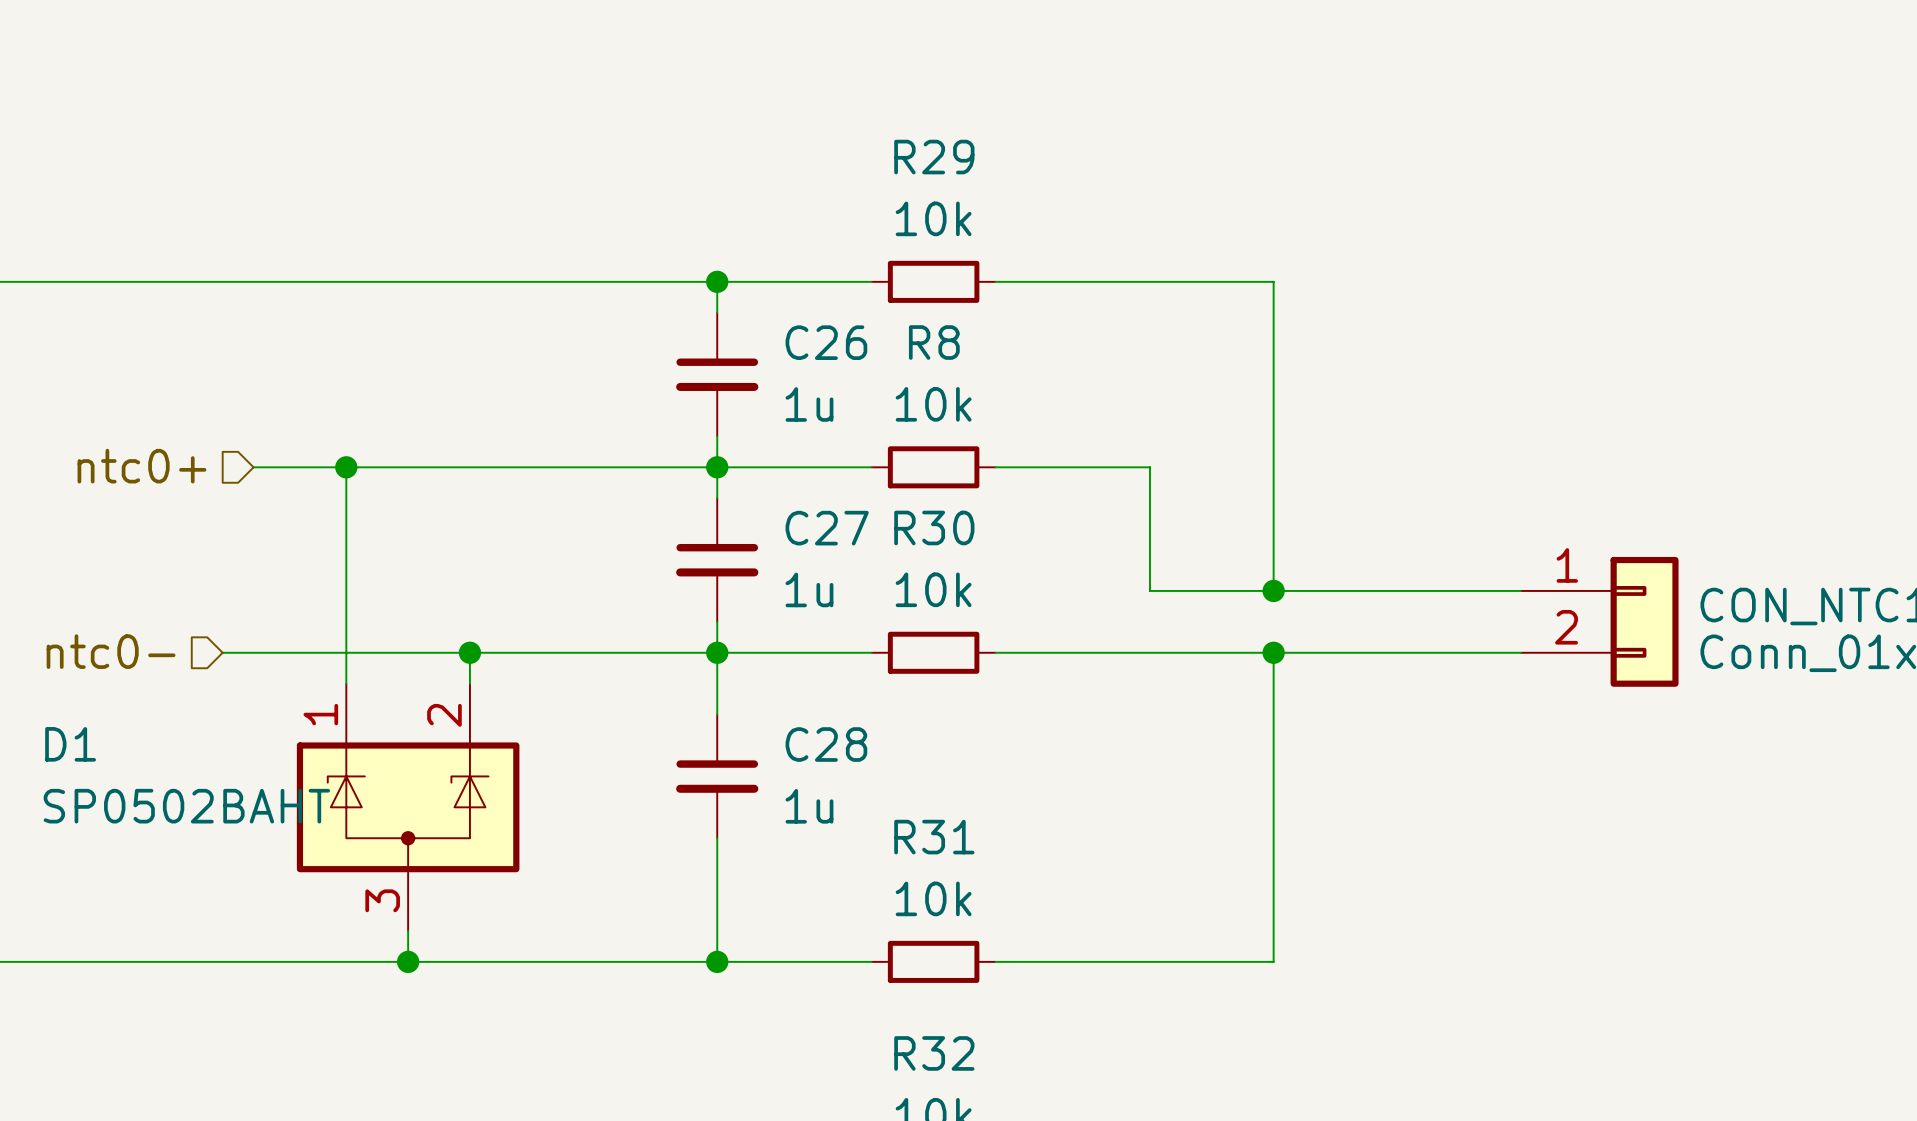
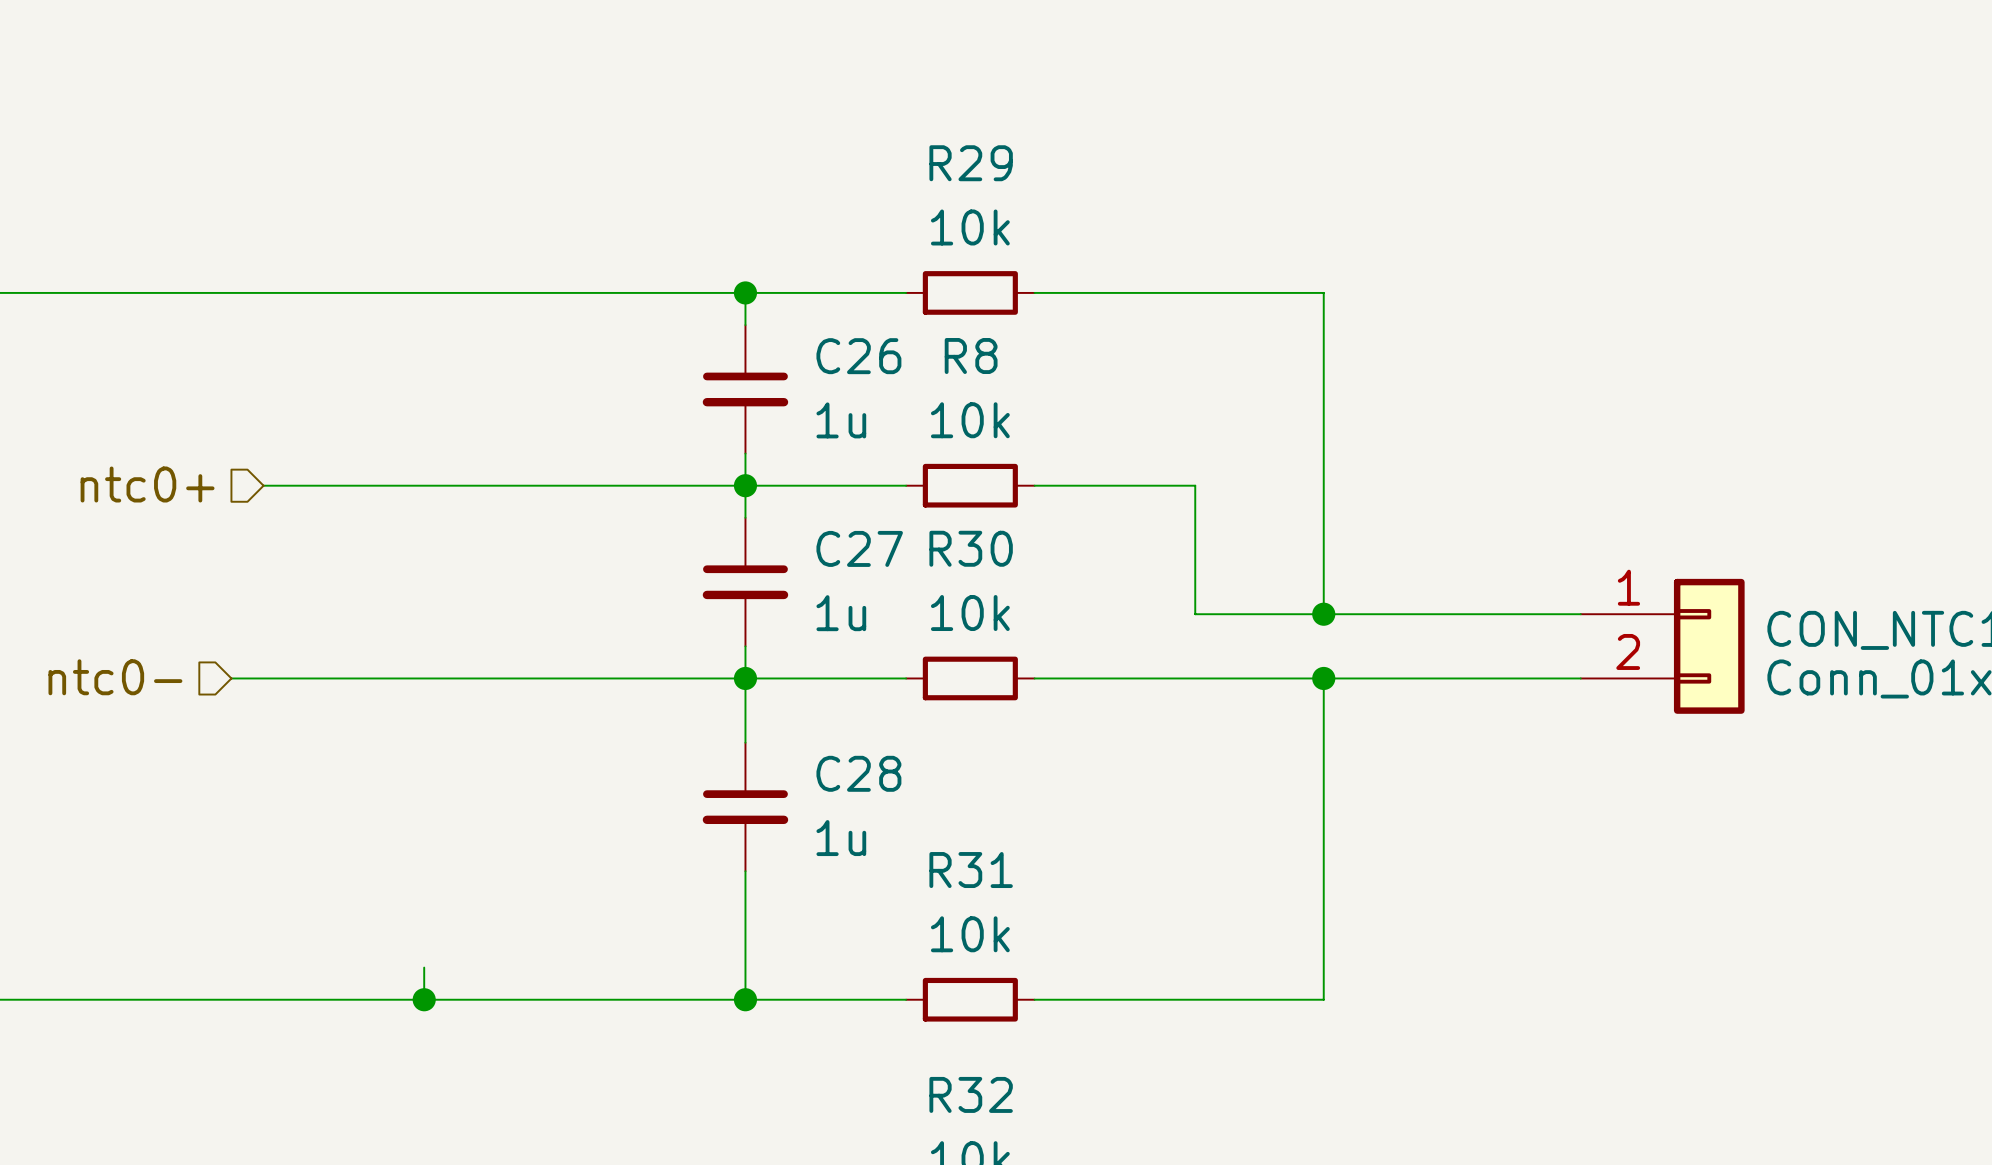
wire: (346, 467) (346, 683) -> none
junction: (346, 467) -> none
wire: (469, 652) (469, 683) -> none
junction: (469, 652) -> none
D1: SP0502BAHT (408, 807) -> none

